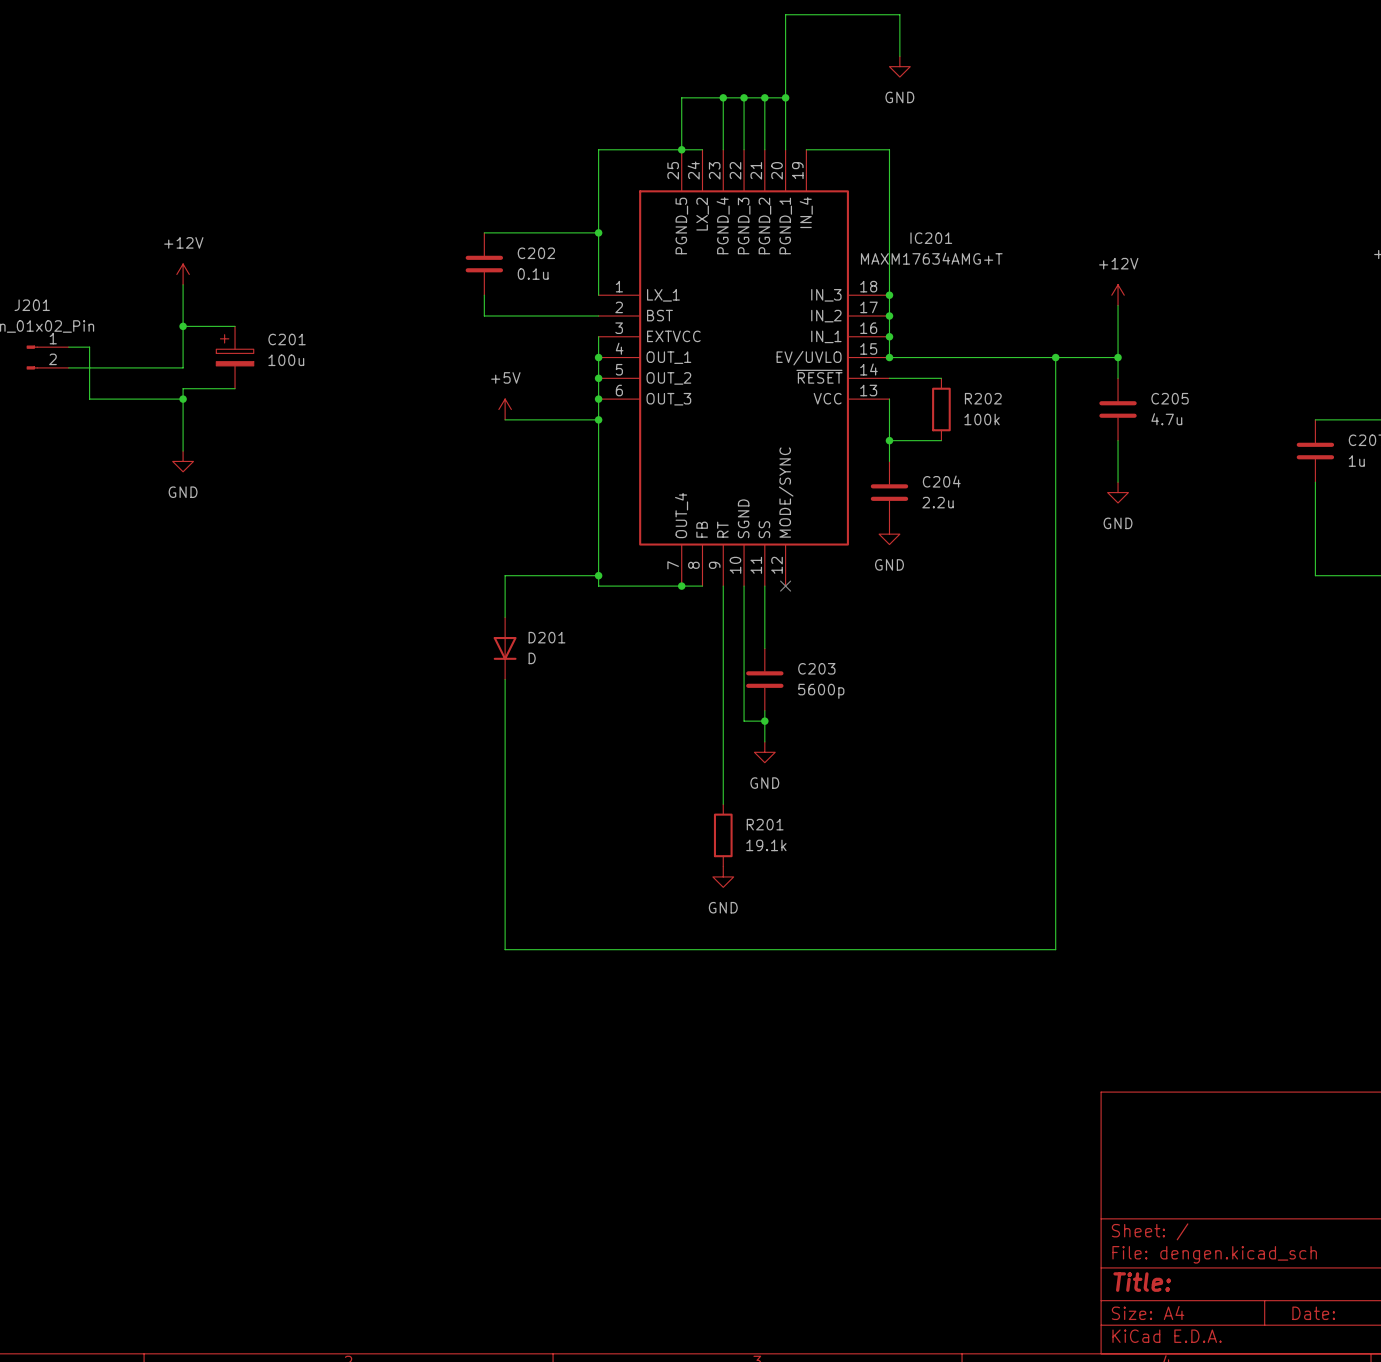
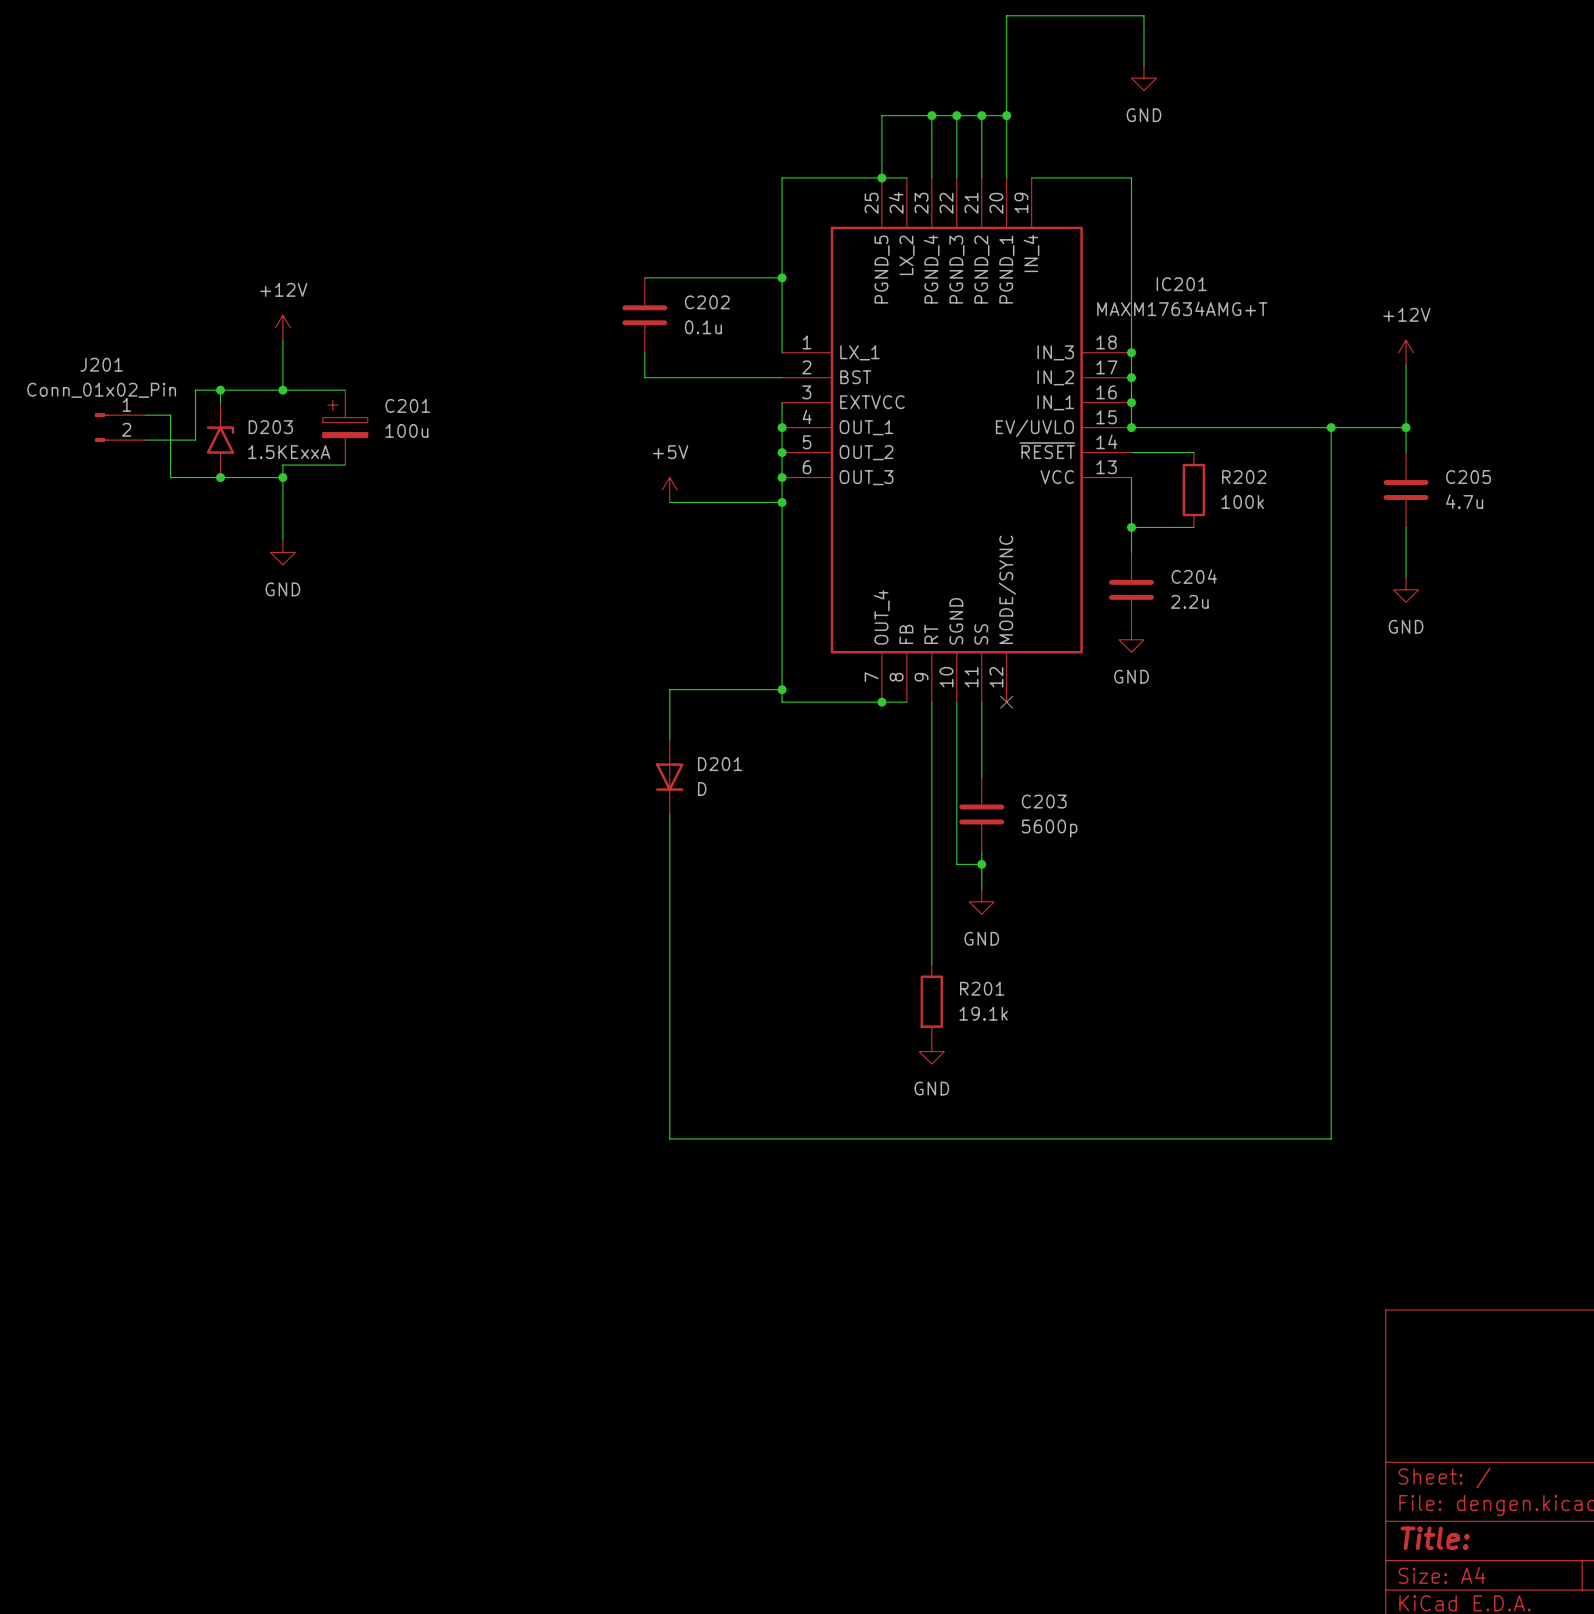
wire: none -> (220, 390) (220, 402)
junction: none -> (220, 390)
wire: (183, 326) (183, 367) (110, 367) -> (282, 390) (195, 390) (195, 440)
D203: none -> 1.5KExxA (220, 440)
junction: none -> (220, 477)

